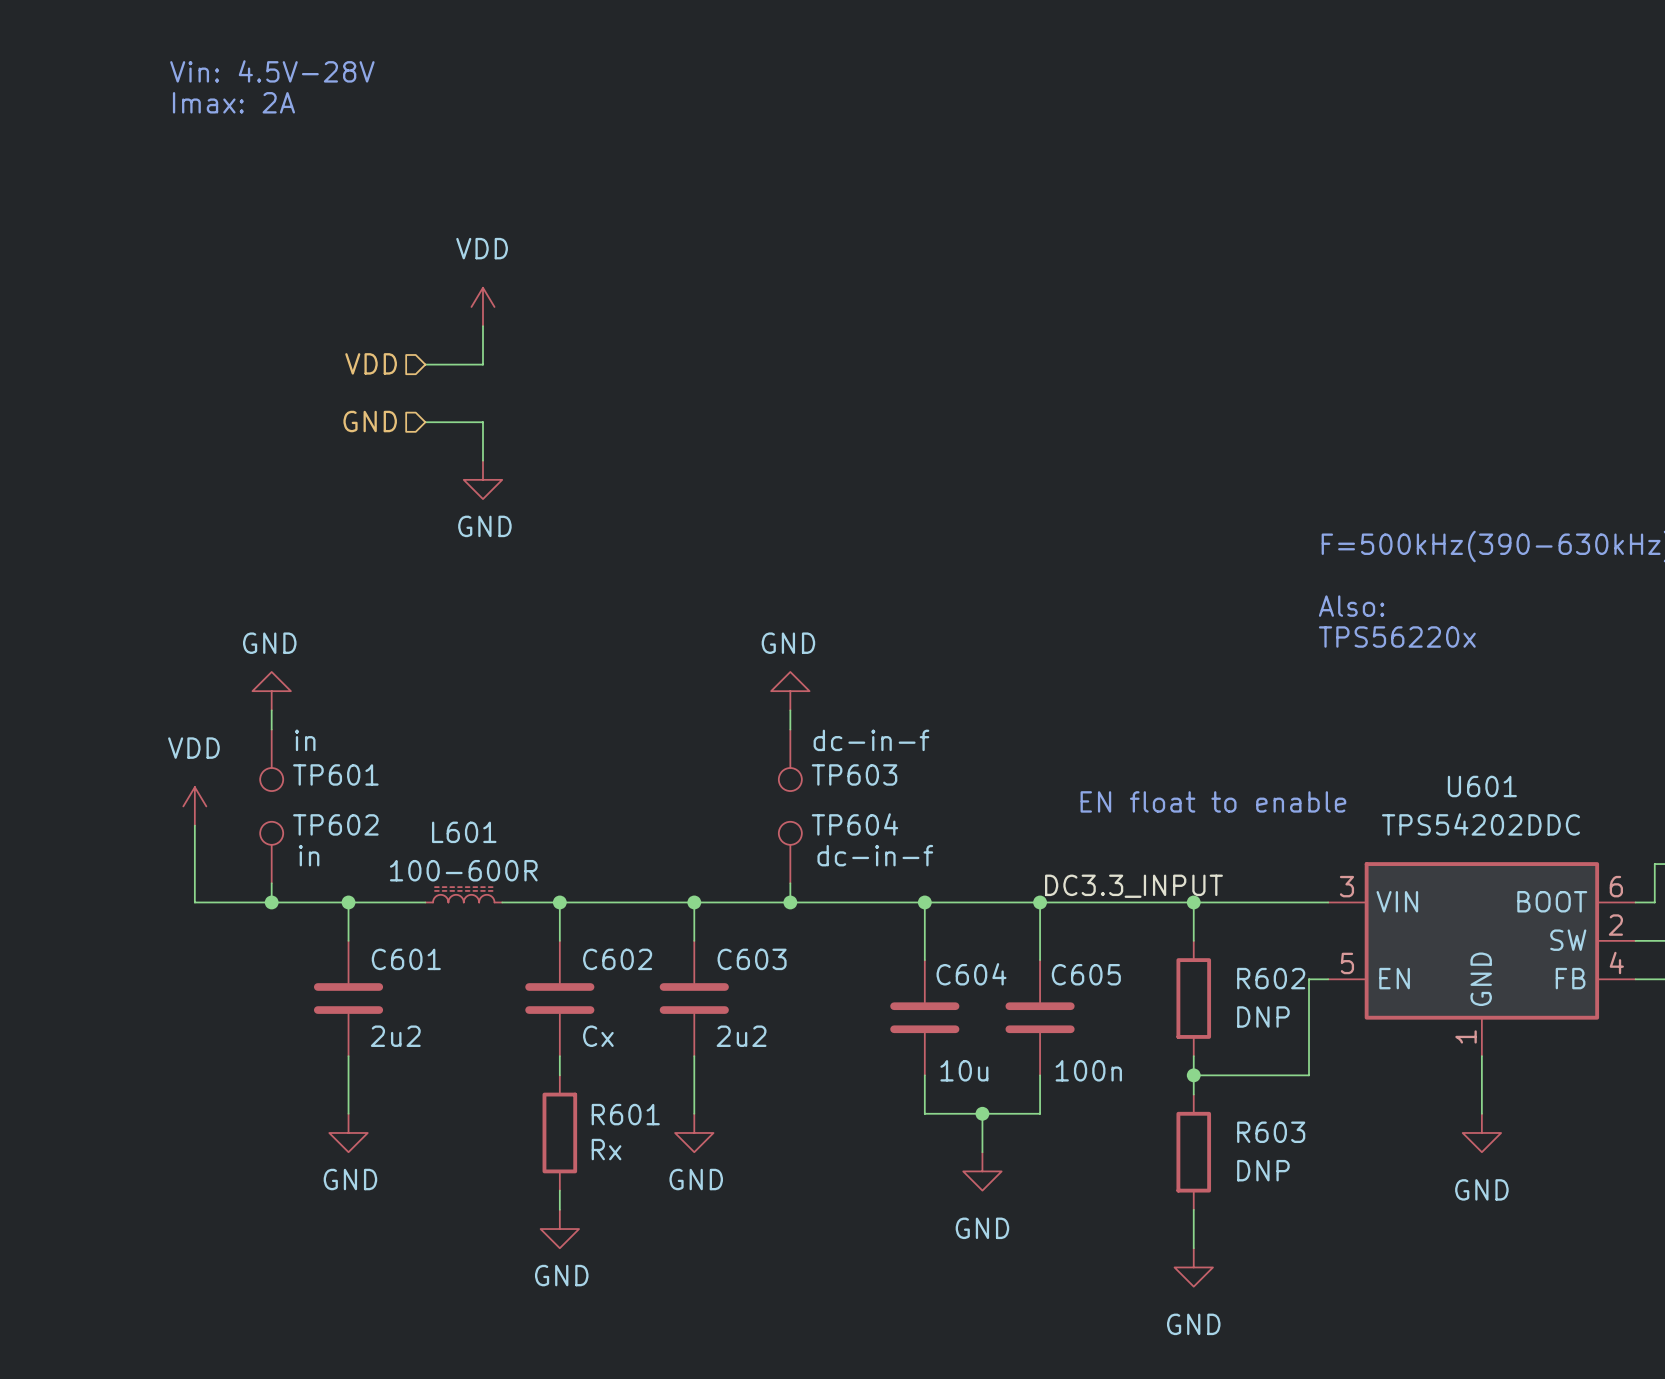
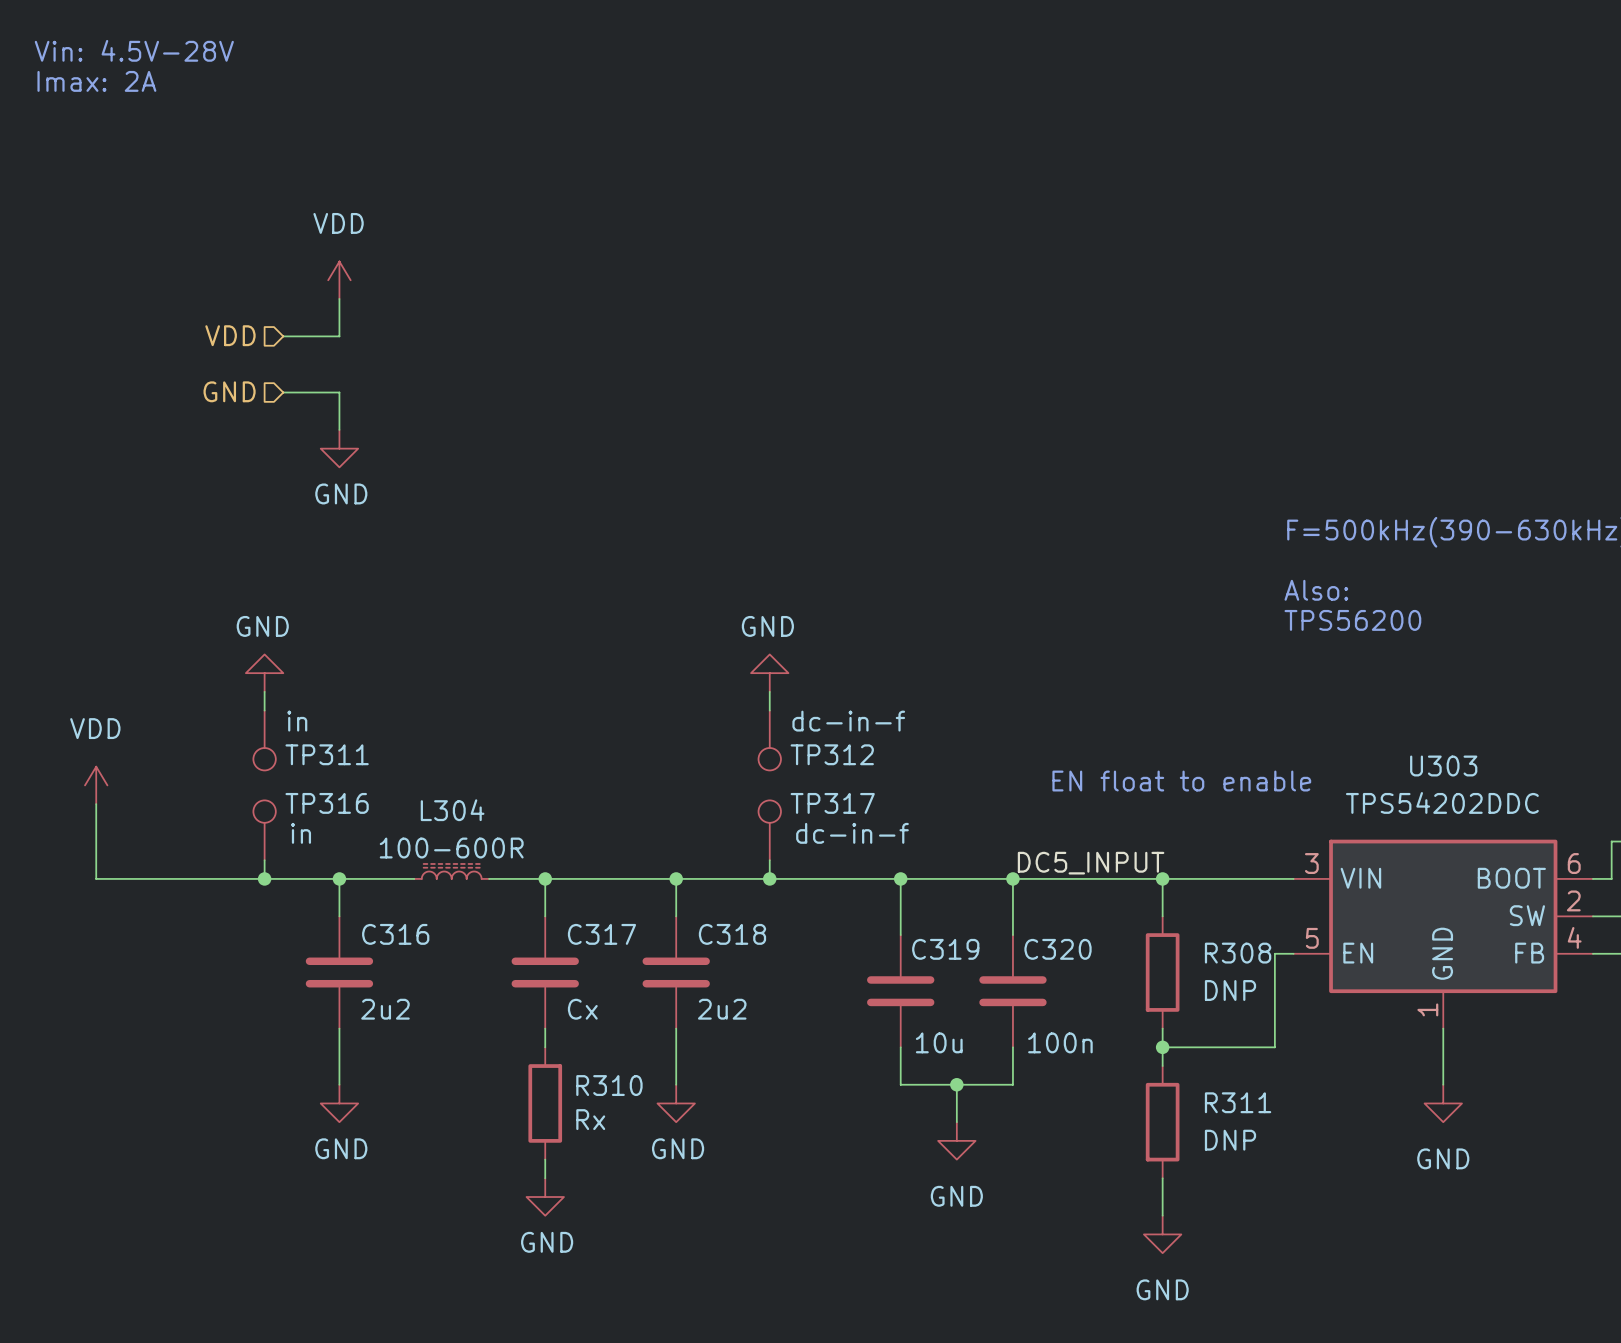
text position: Vin: 4.5V-28V (272, 71) -> Vin: 4.5V-28V (134, 50)
text position: Imax: 2A (233, 102) -> Imax: 2A (96, 81)
power symbol position: VDD (482, 306) -> VDD (339, 280)
wire: (482, 326) (482, 364) (425, 364) -> (339, 298) (339, 336) (283, 336)
hierarchical label position: VDD (371, 363) -> VDD (230, 335)
hierarchical label position: GND (370, 421) -> GND (229, 391)
wire: (425, 422) (482, 422) (482, 460) -> (283, 392) (339, 392) (339, 429)
power symbol position: GND (482, 479) -> GND (339, 448)
text: TPS56220x (1397, 637) -> TPS56200 (1352, 620)
TP601 name: TP601 (335, 774) -> TP311 (327, 754)
TP603 name: TP603 (854, 774) -> TP312 (832, 754)
U601 name: U601 (1482, 786) -> U303 (1443, 766)
power symbol position: VDD (194, 806) -> VDD (96, 785)
TP602 name: TP602 (335, 824) -> TP316 (327, 803)
TP604 name: TP604 (854, 824) -> TP317 (832, 803)
wire: (194, 825) (194, 902) -> (96, 804) (96, 878) (189, 878)
L601 name: L601 (464, 832) -> L304 (452, 810)
label: DC3.3_INPUT (1133, 886) -> DC5_INPUT (1091, 863)
C601 name: C601 (406, 959) -> C316 (395, 934)
C602 name: C602 (617, 959) -> C317 (601, 934)
C603 name: C603 (752, 959) -> C318 (732, 934)
C604 name: C604 (971, 974) -> C319 (945, 949)
C605 name: C605 (1086, 974) -> C320 (1058, 949)
R602 name: R602 (1271, 978) -> R308 (1238, 953)
R601 name: R601 (625, 1114) -> R310 (609, 1085)
R603 name: R603 (1271, 1132) -> R311 (1238, 1102)

